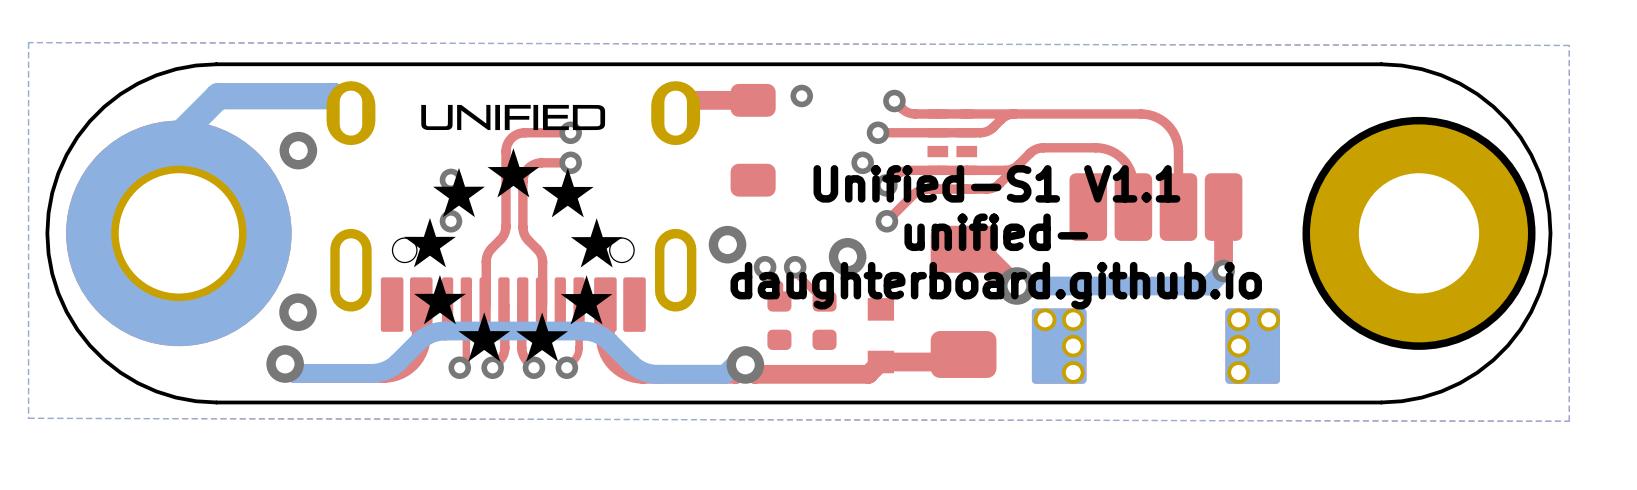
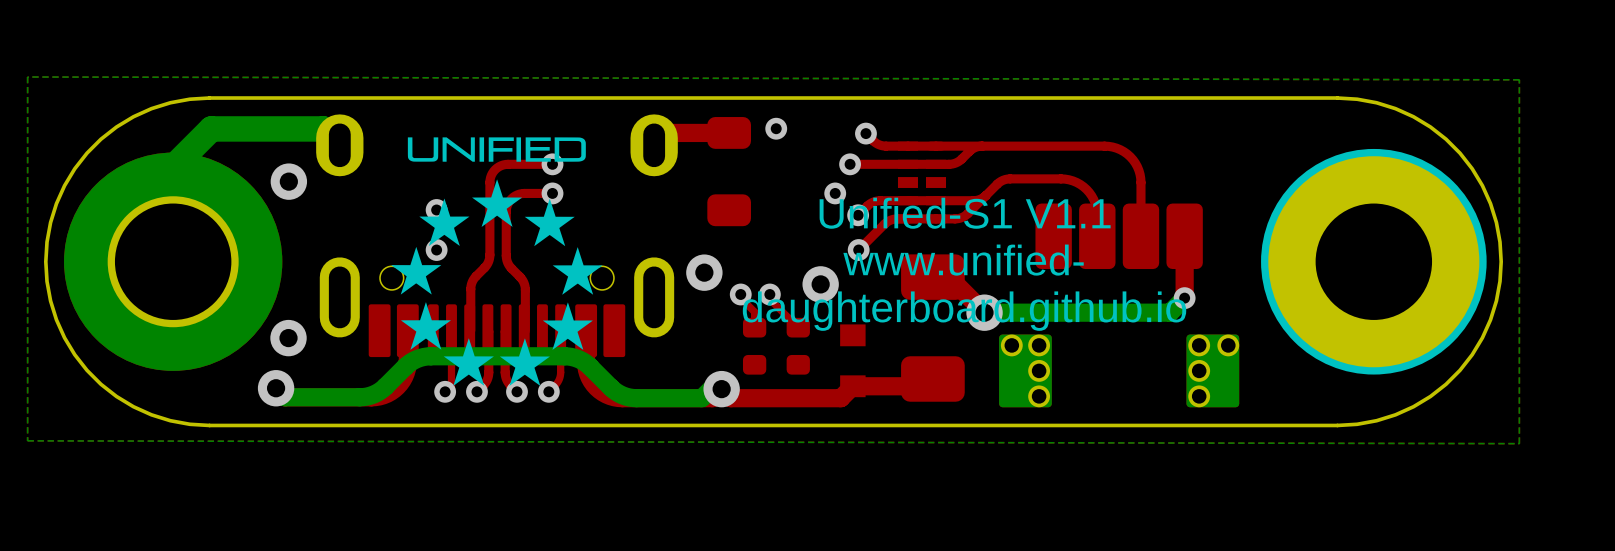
text: unified- (996, 232) -> www.unified- (963, 260)

